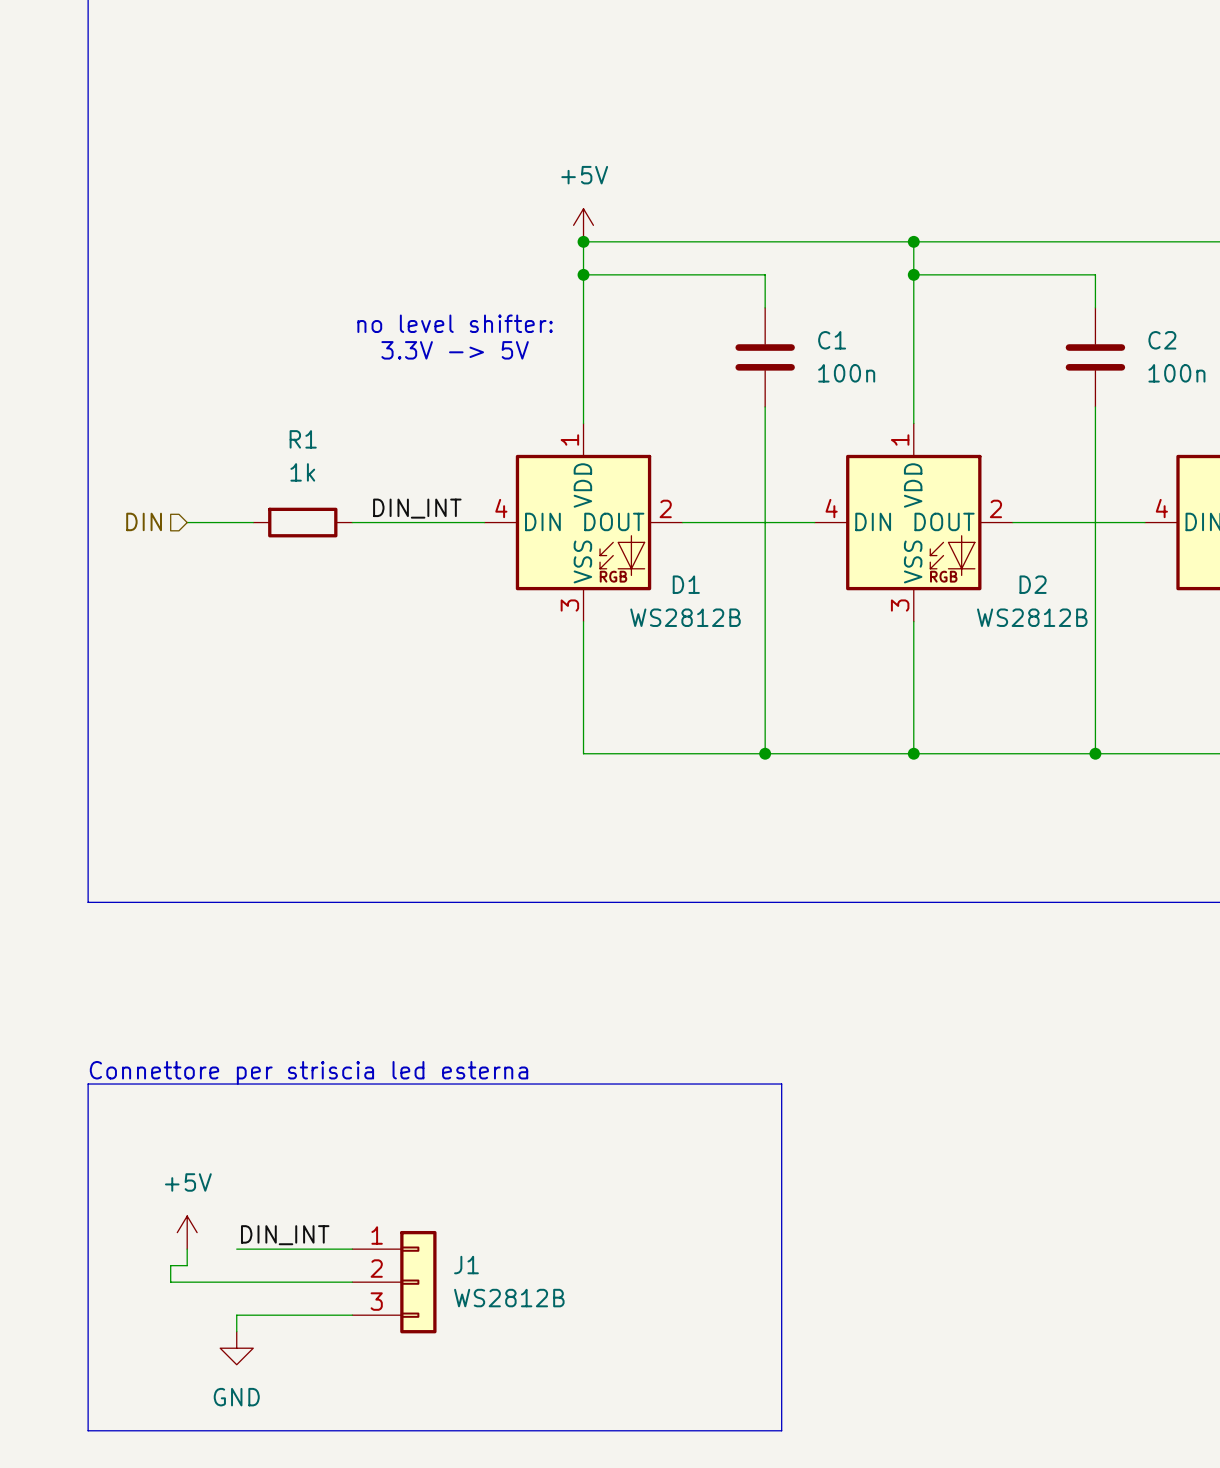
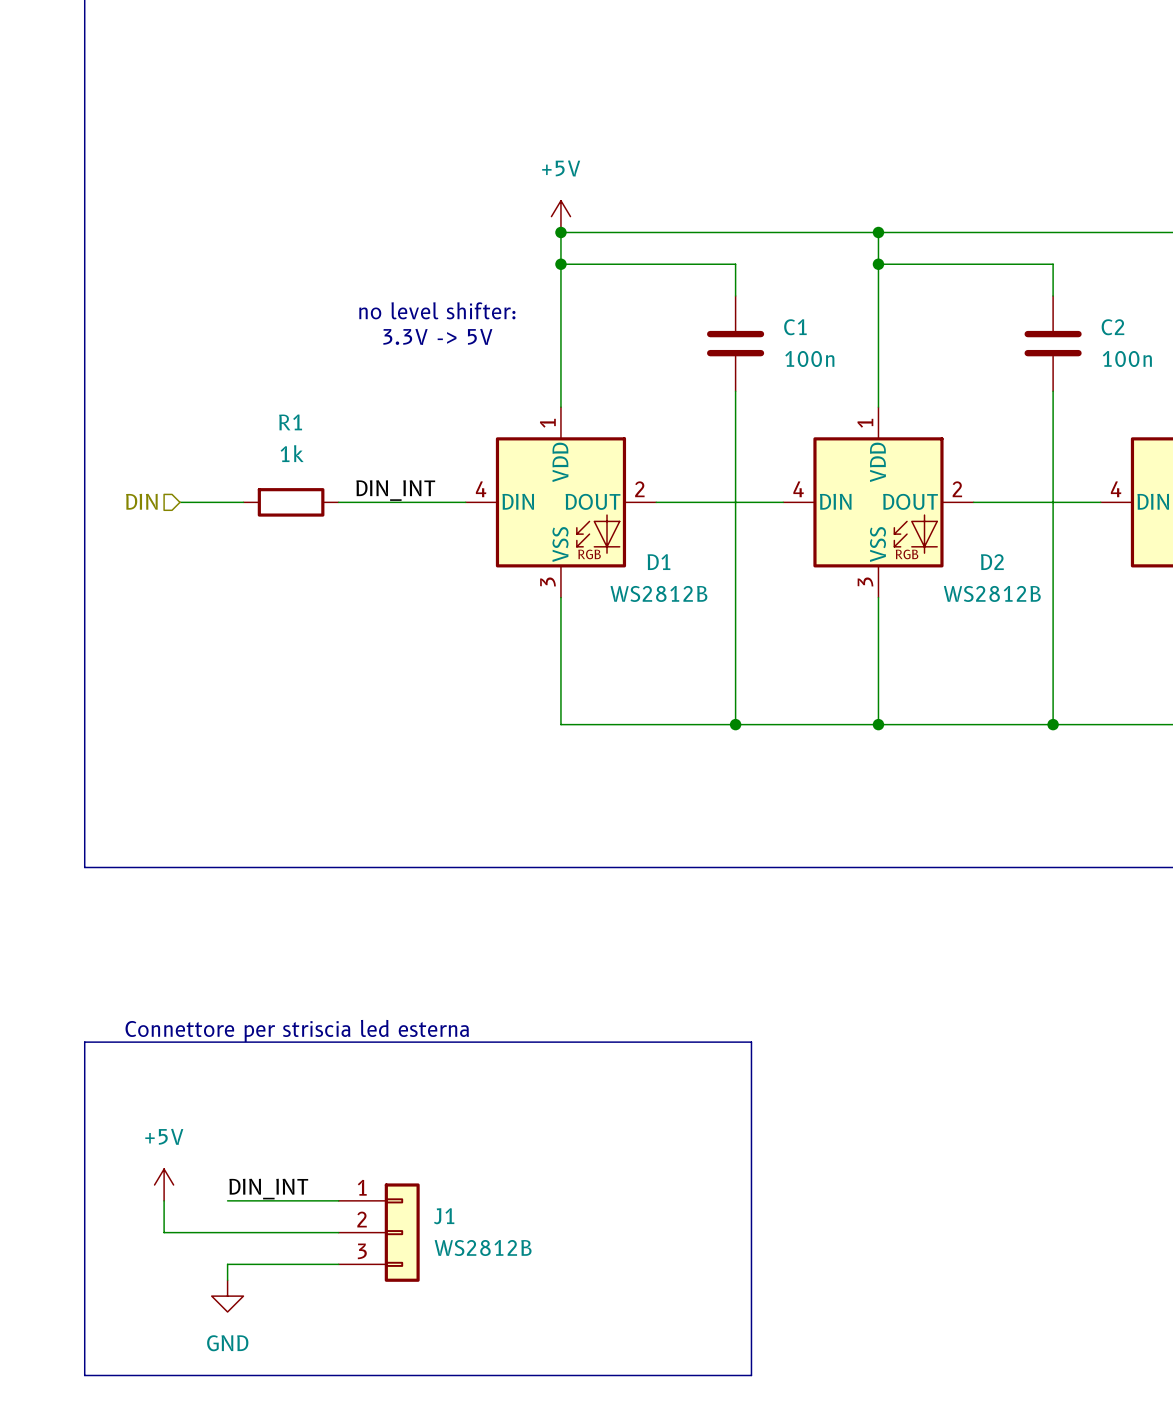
power symbol position: +5V (187, 1232) -> +5V (164, 1184)
wire: (187, 1249) (187, 1265) (170, 1265) -> (164, 1200) (164, 1216)

